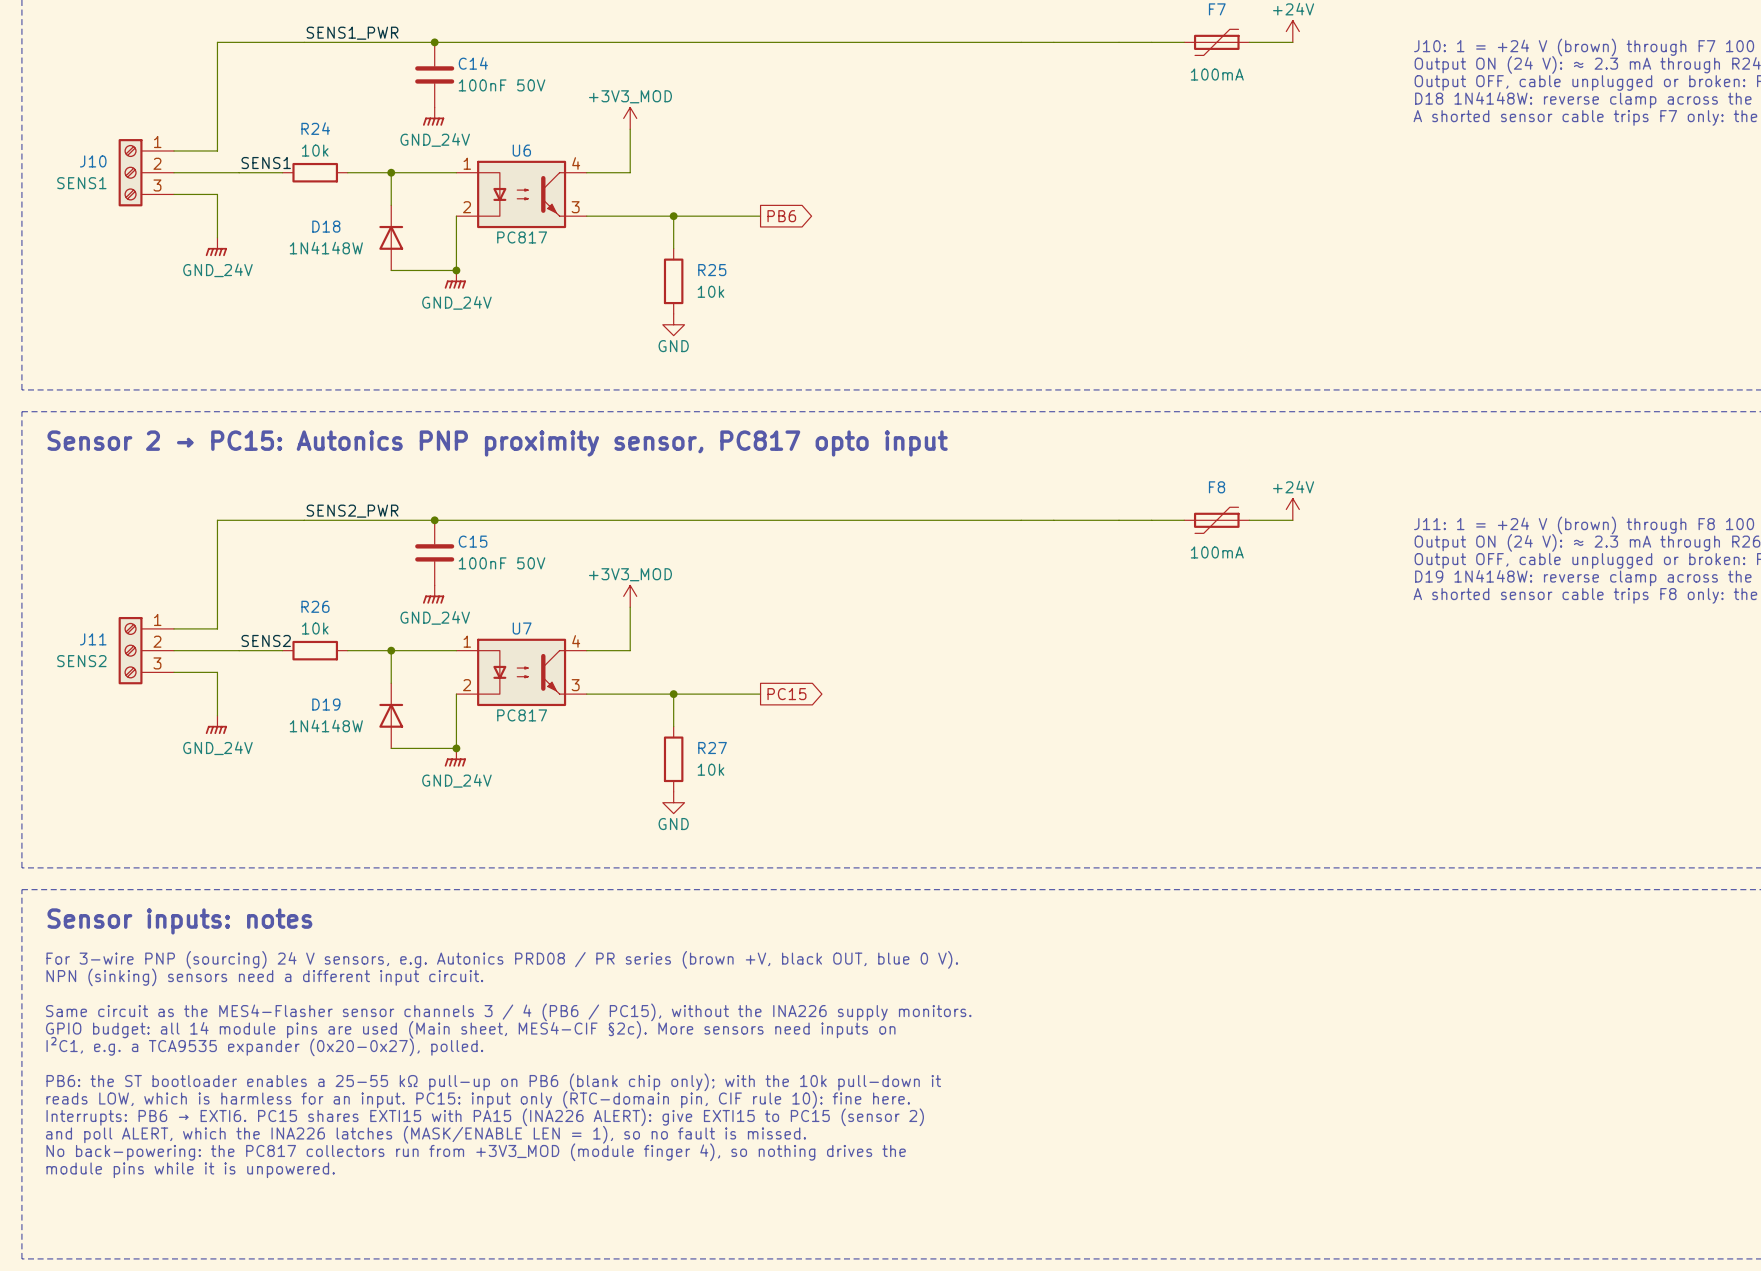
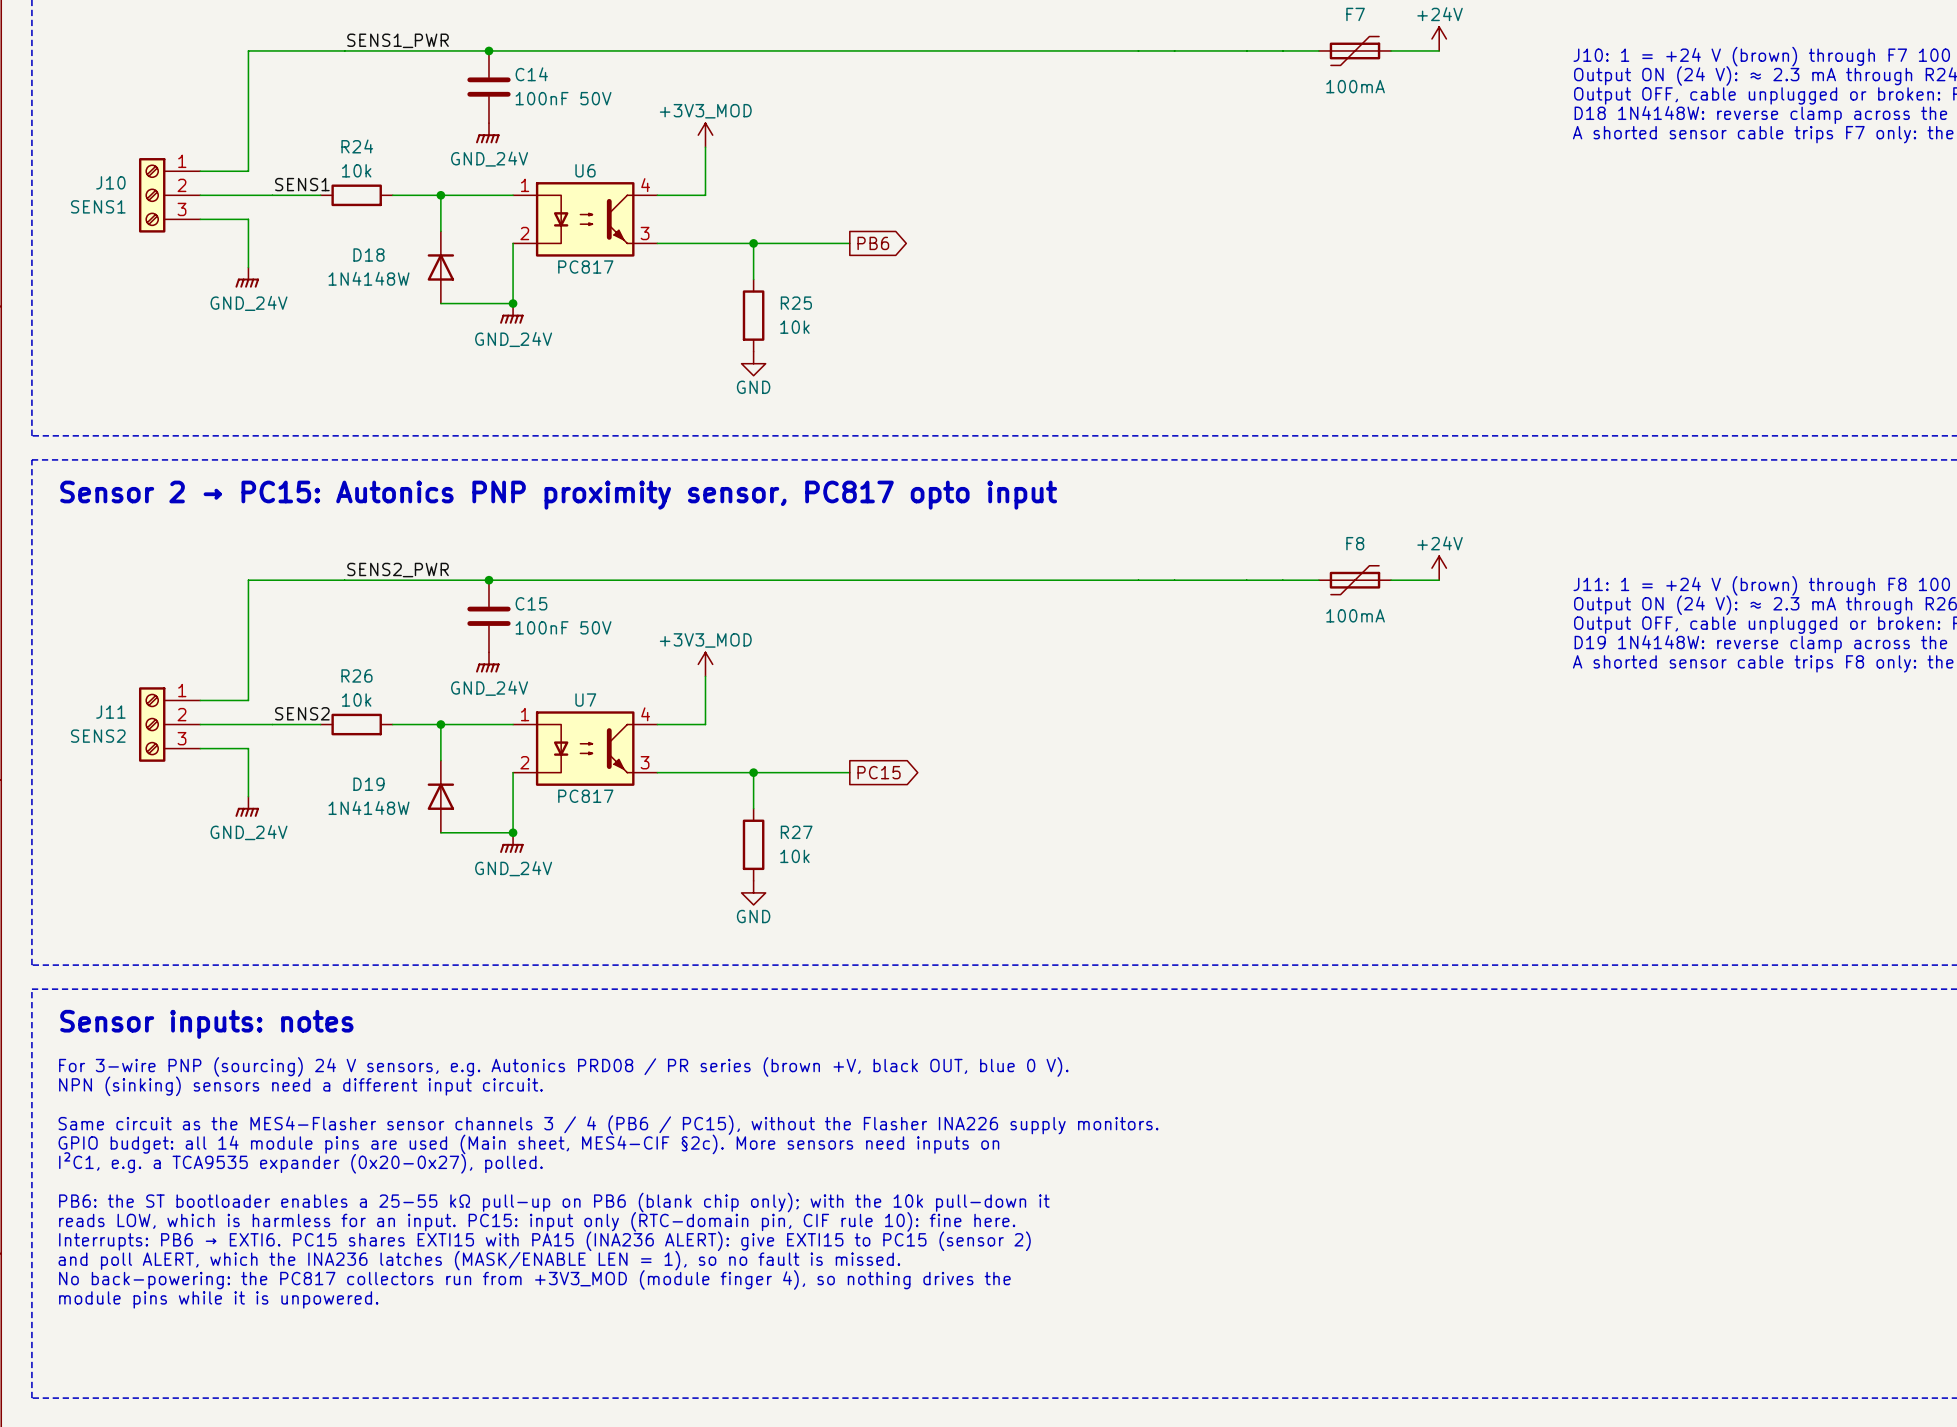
text: Same circuit as the MES4-Flasher sensor channels 3 / 4 (PB6 / PC15), without the INA226 supply monitors. (508, 1012) -> Same circuit as the MES4-Flasher sensor channels 3 / 4 (PB6 / PC15), without the Flasher INA226 supply monitors. (608, 1125)
text: Interrupts: PB6 → EXTI6. PC15 shares EXTI15 with PA15 (INA226 ALERT): give EXTI15 to PC15 (sensor 2) (485, 1117) -> Interrupts: PB6 → EXTI6. PC15 shares EXTI15 with PA15 (INA236 ALERT): give EXTI15 to PC15 (sensor 2) (544, 1241)
text: and poll ALERT, which the INA226 latches (MASK/ENABLE LEN = 1), so no fault is missed. (425, 1134) -> and poll ALERT, which the INA236 latches (MASK/ENABLE LEN = 1), so no fault is missed. (479, 1260)

